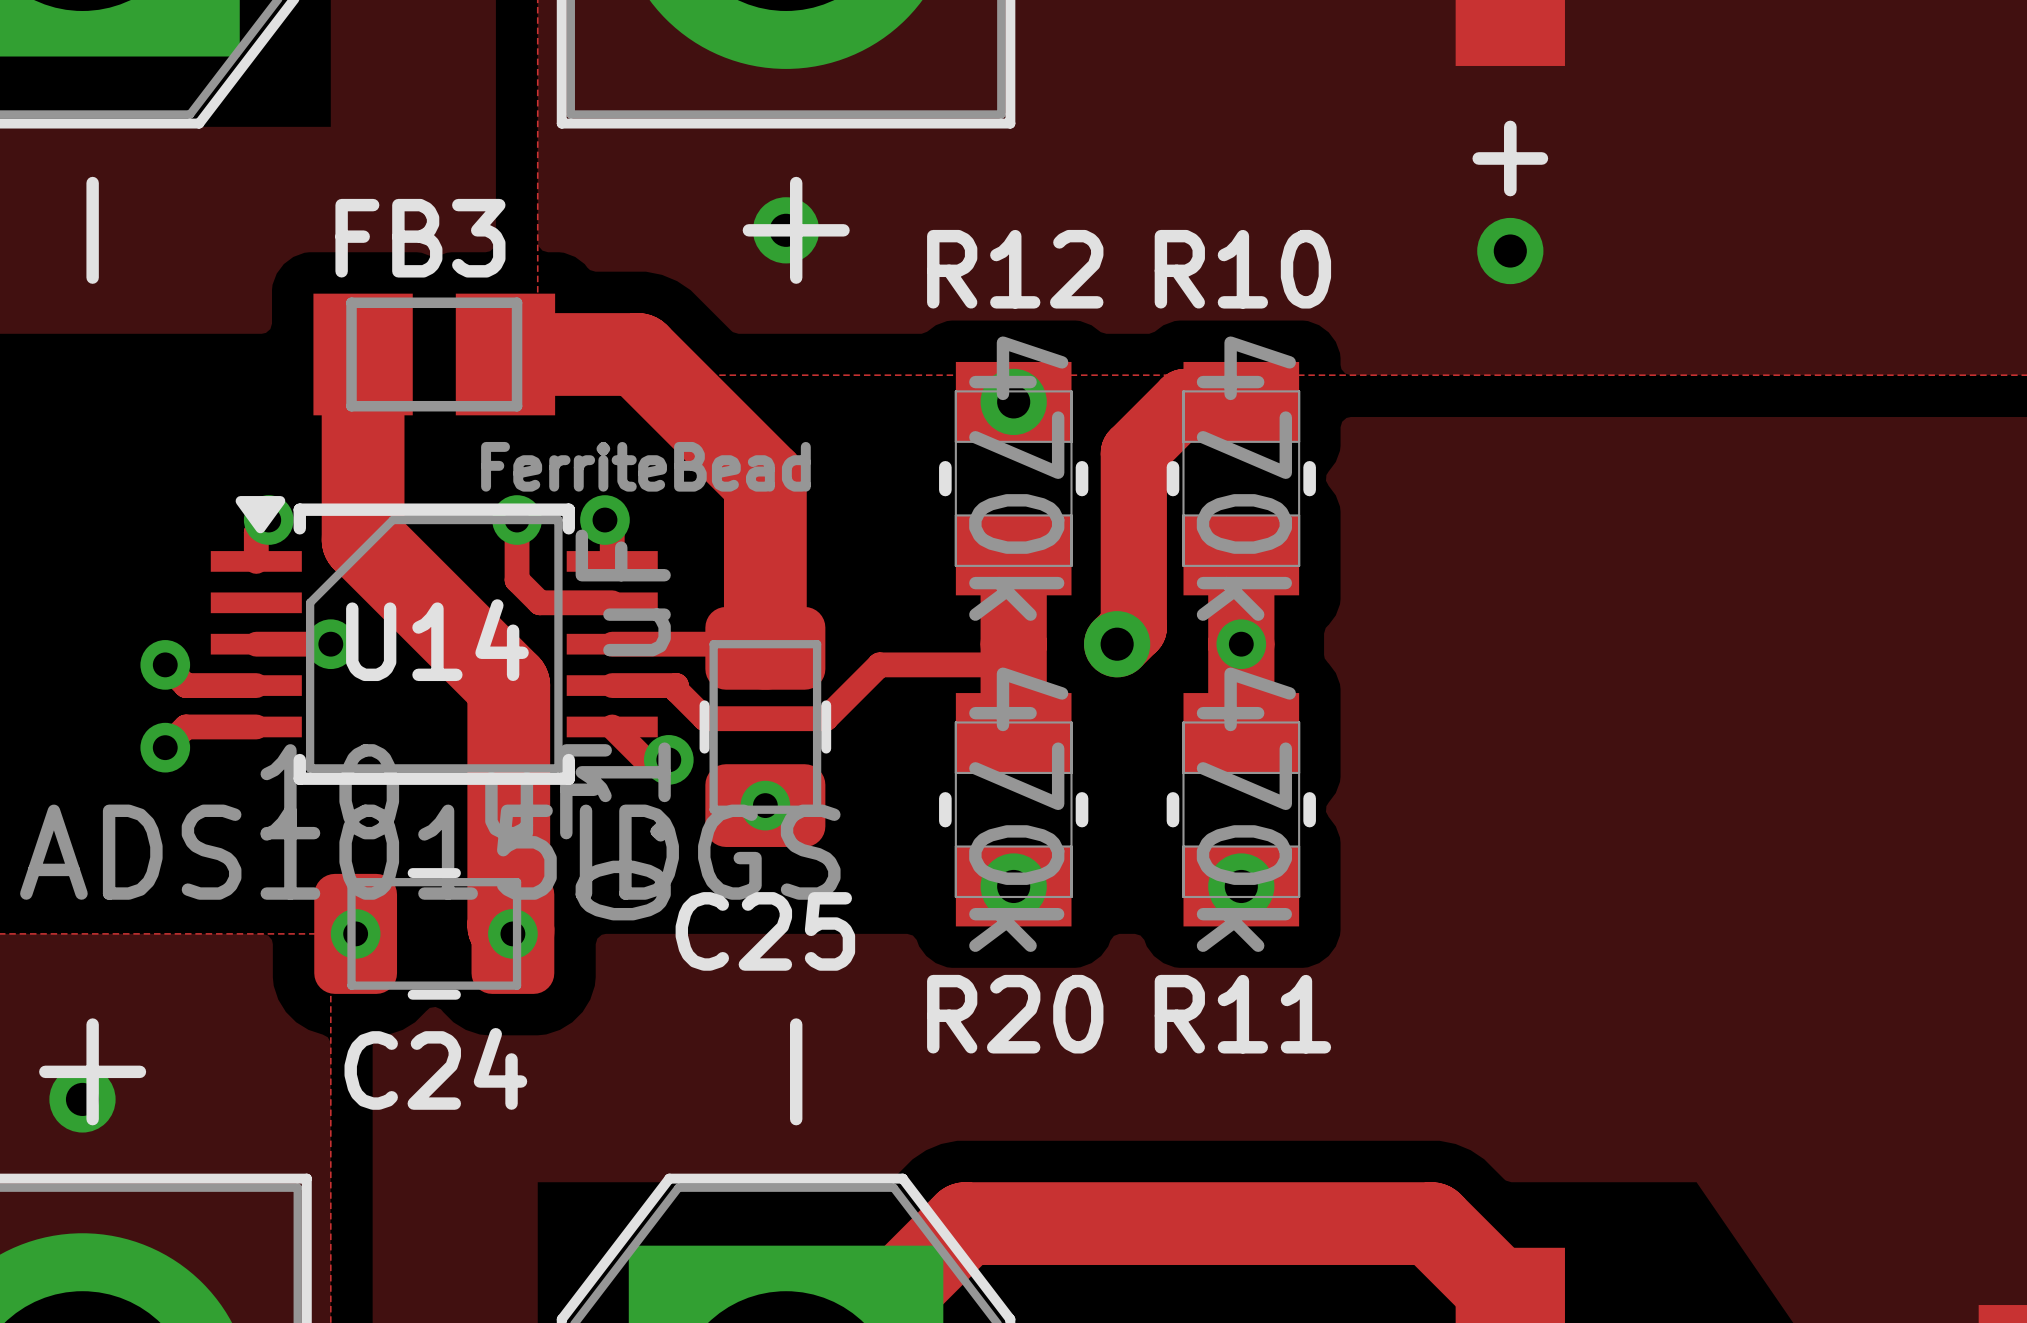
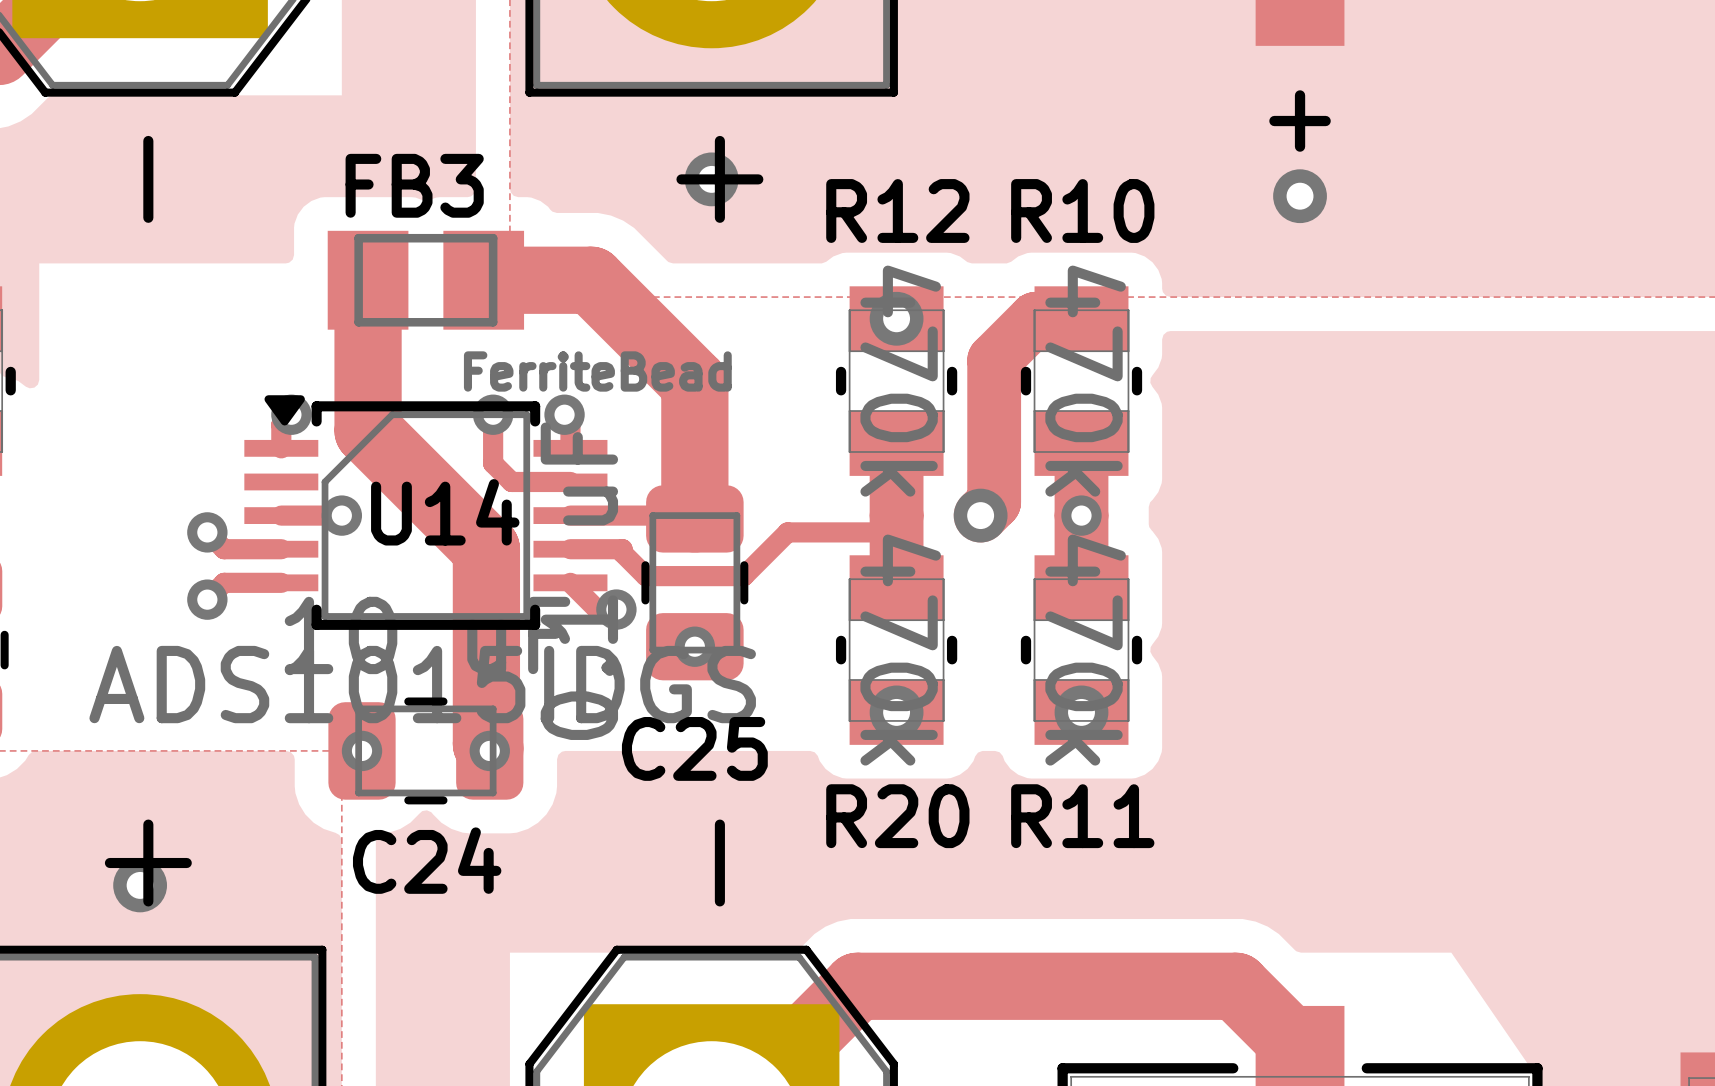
U14 name position: U14 (437, 640) -> U14 (445, 512)

